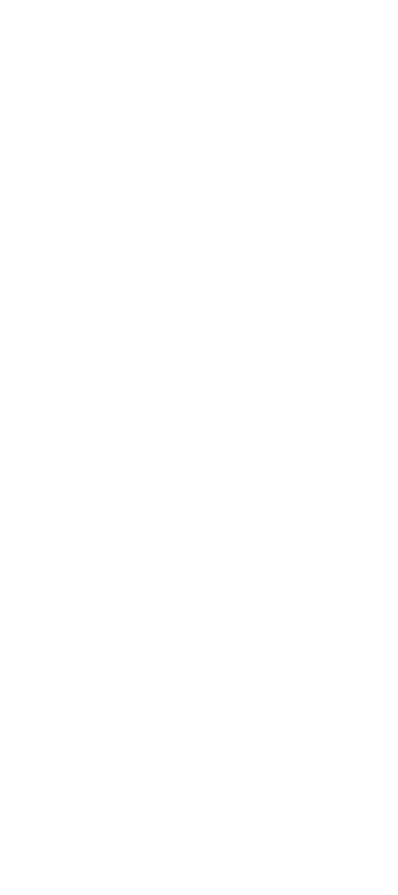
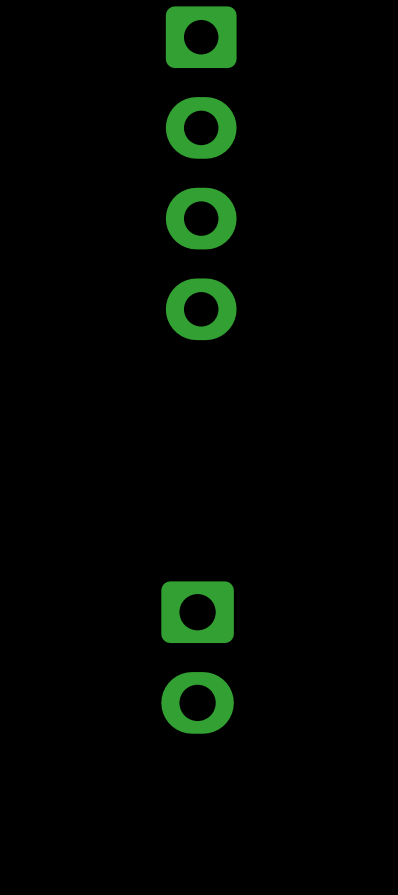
part: none -> (201, 173)
part: none -> (197, 657)

